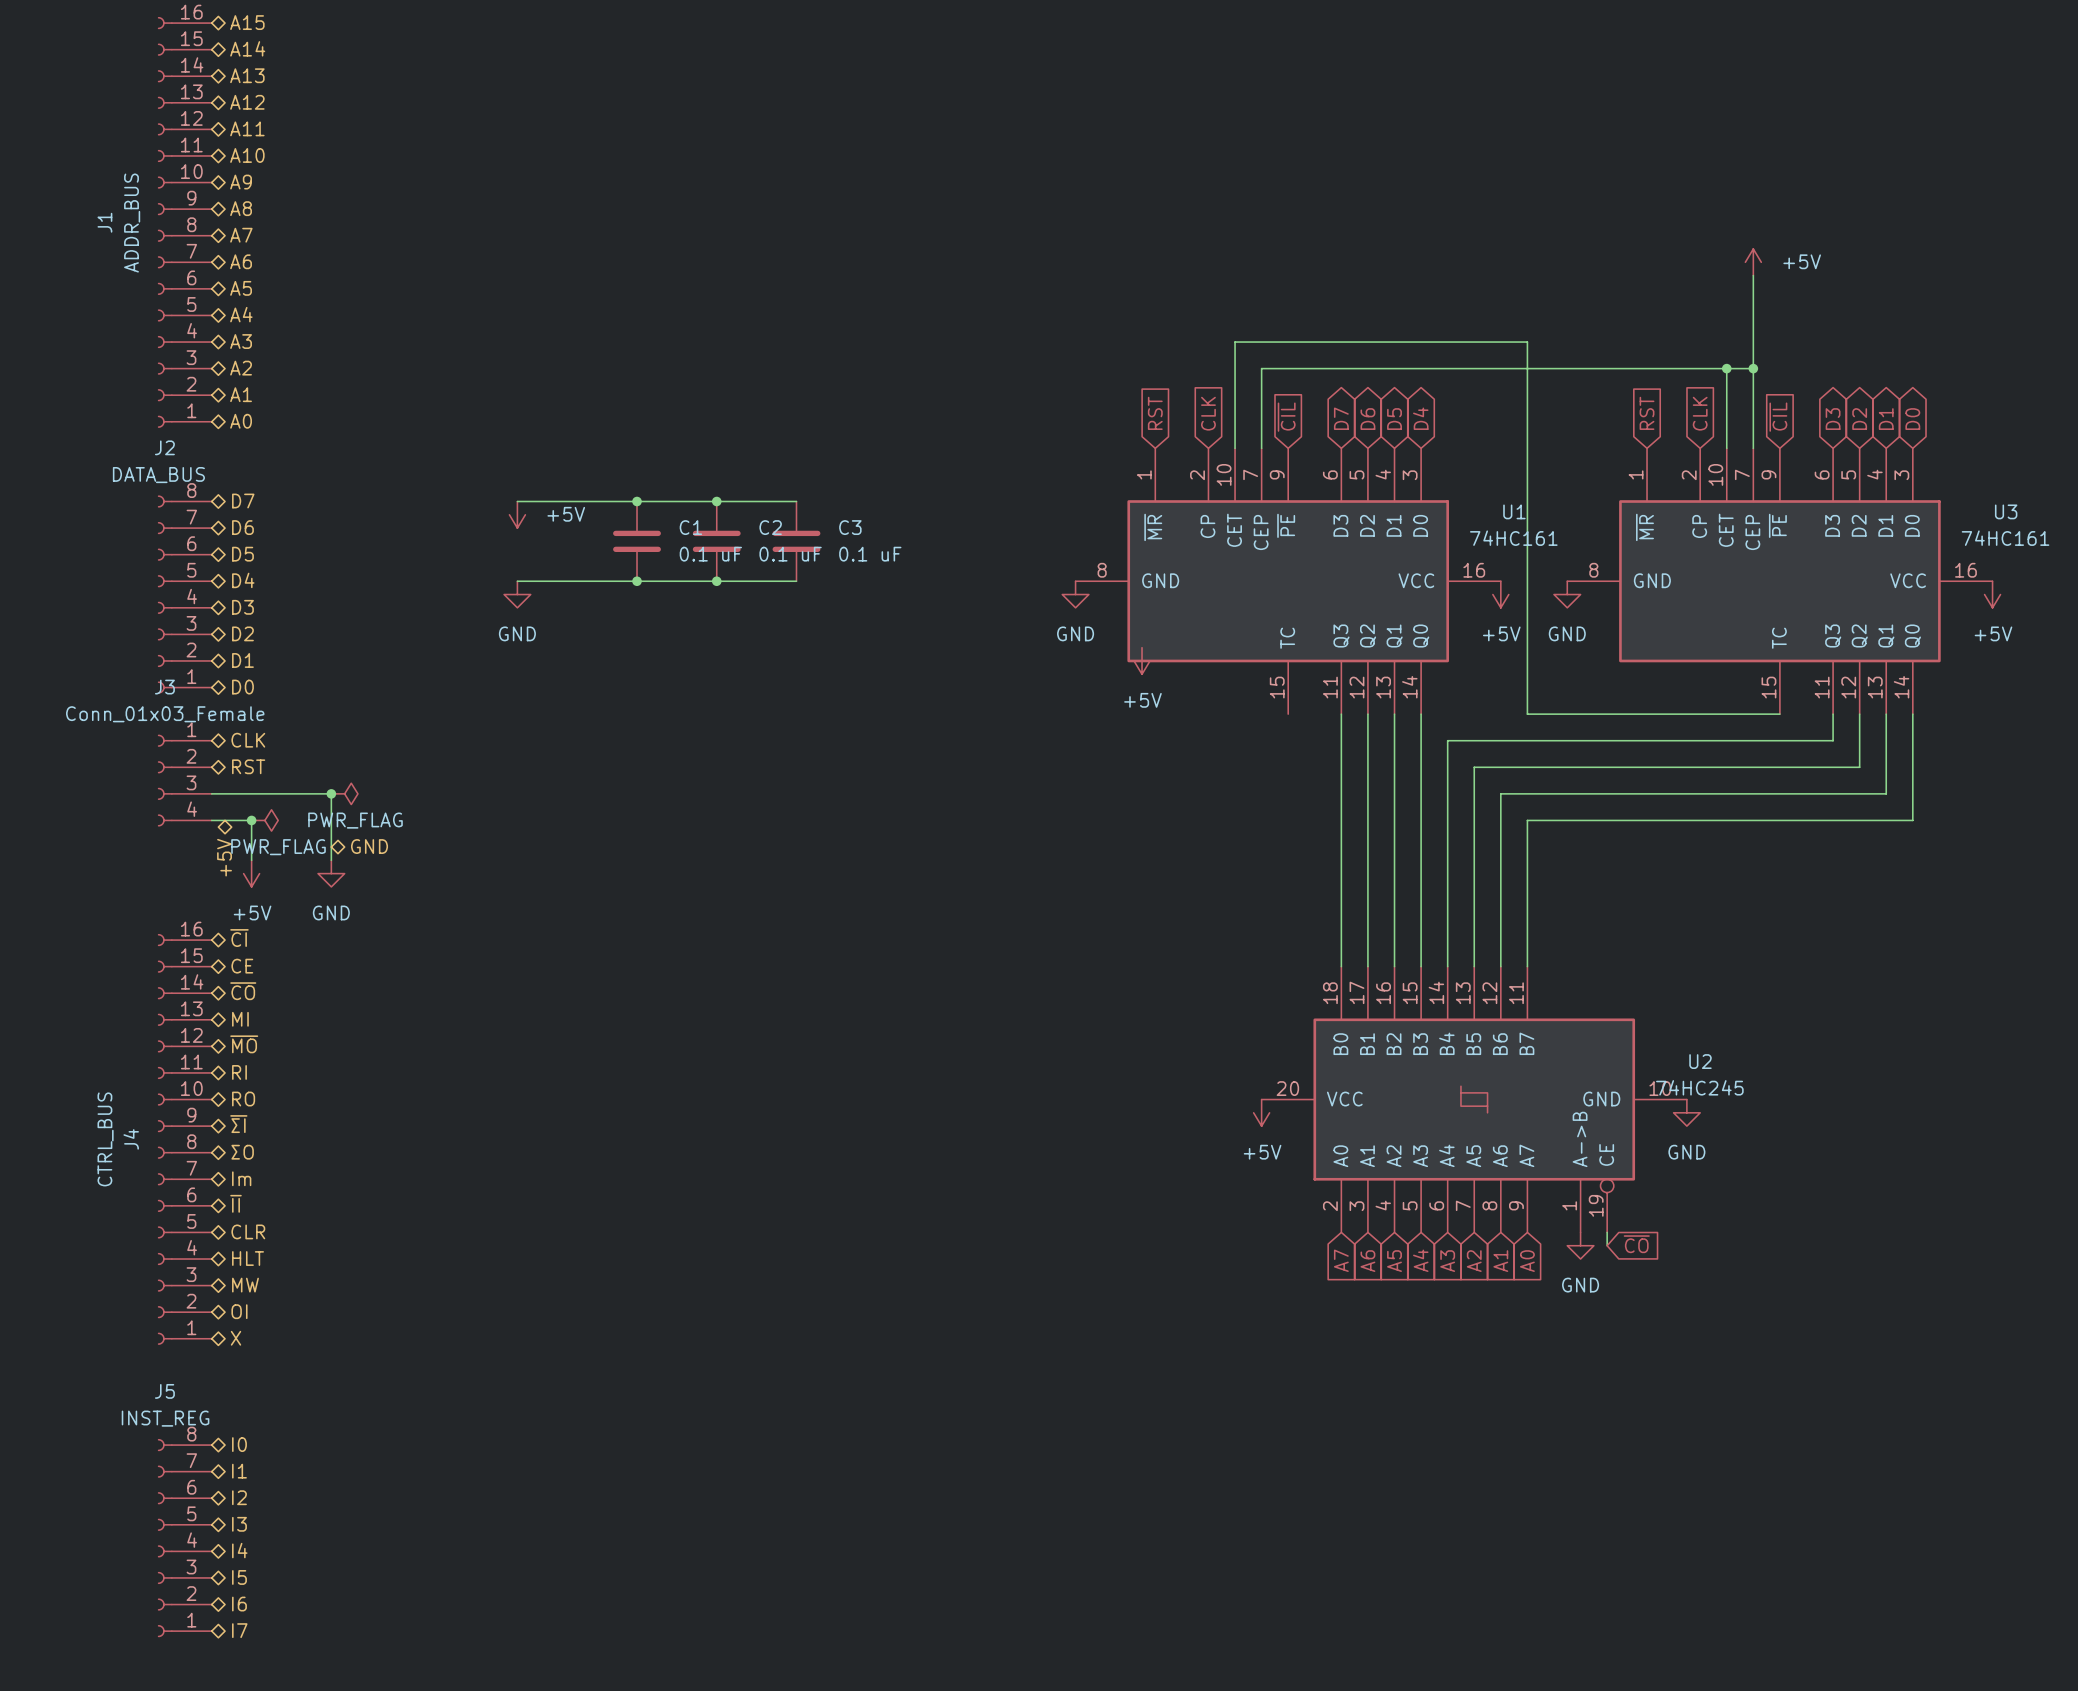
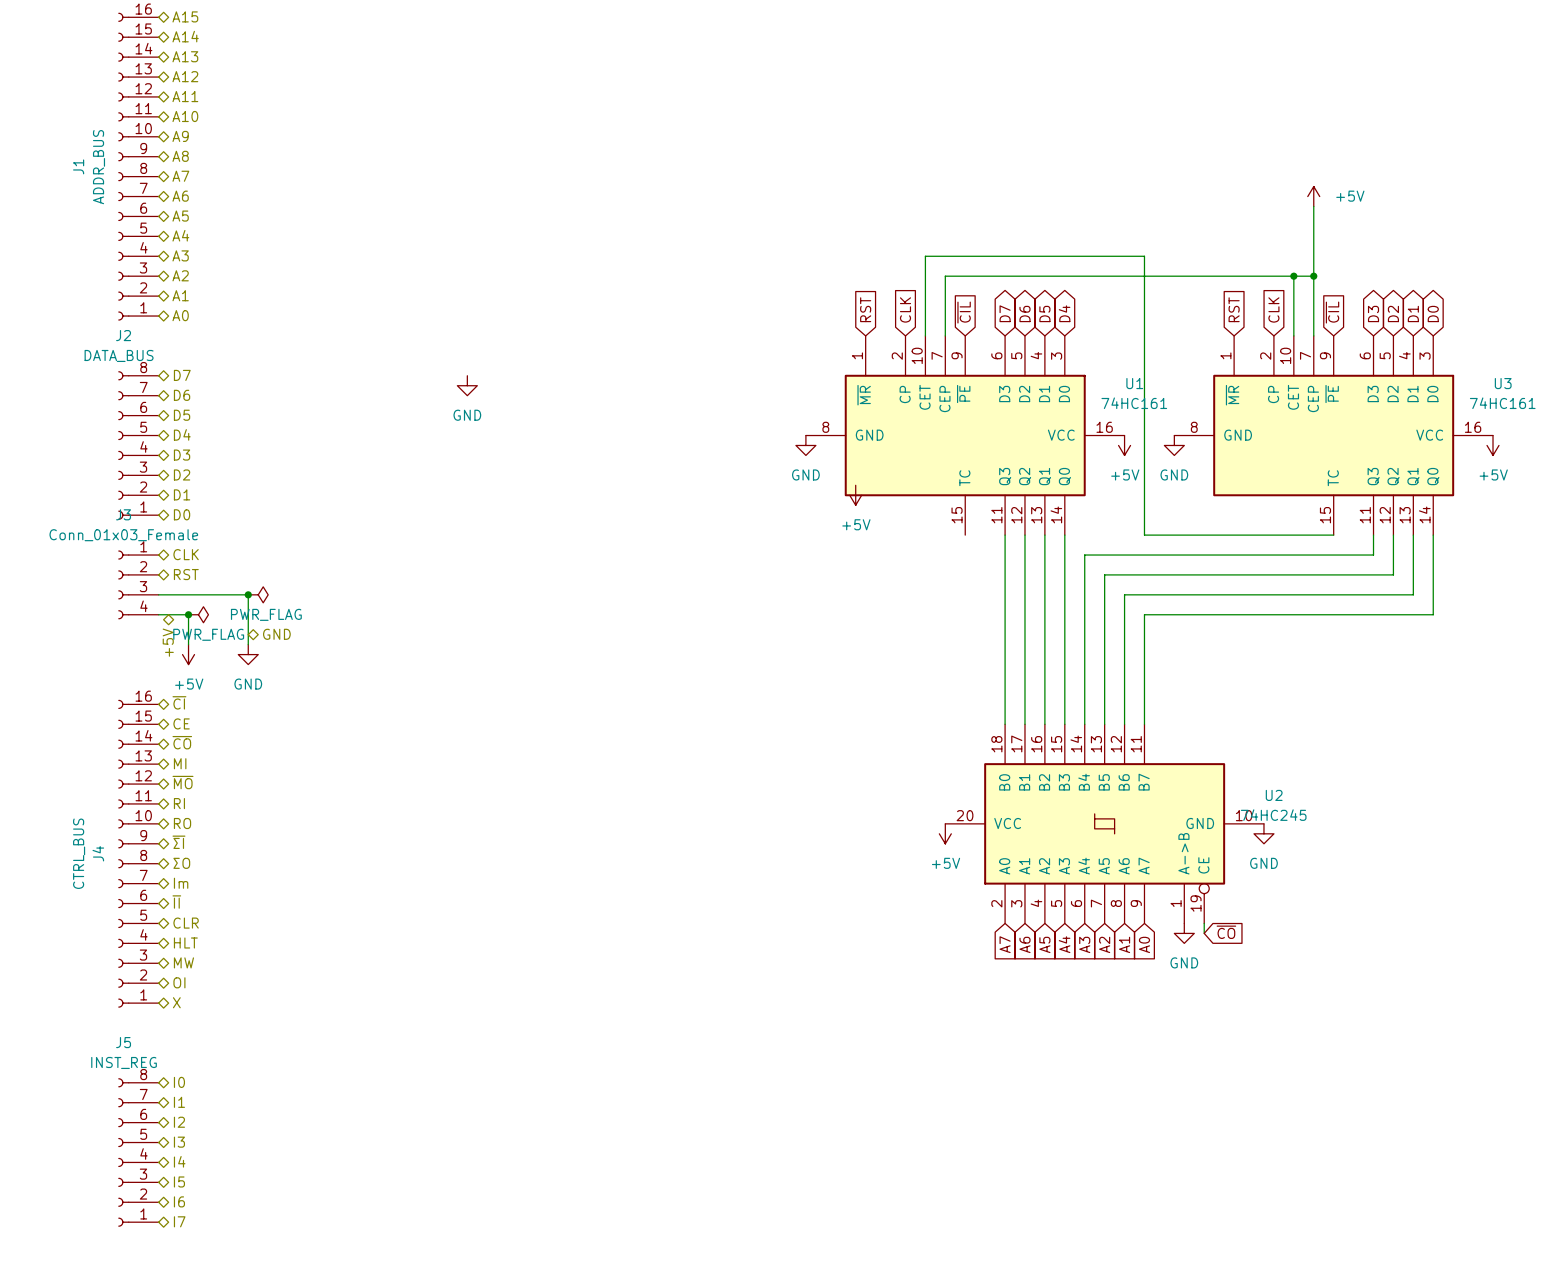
wire: (517, 501) (796, 501) -> none
junction: (637, 501) -> none
junction: (716, 501) -> none
power symbol: +5V (517, 514) -> none
C1: 0.1 uF (637, 541) -> none
C2: 0.1 uF (716, 541) -> none
C3: 0.1 uF (796, 541) -> none
wire: (517, 581) (796, 581) -> none
junction: (637, 581) -> none
junction: (716, 581) -> none
power symbol position: GND (517, 594) -> GND (467, 385)

